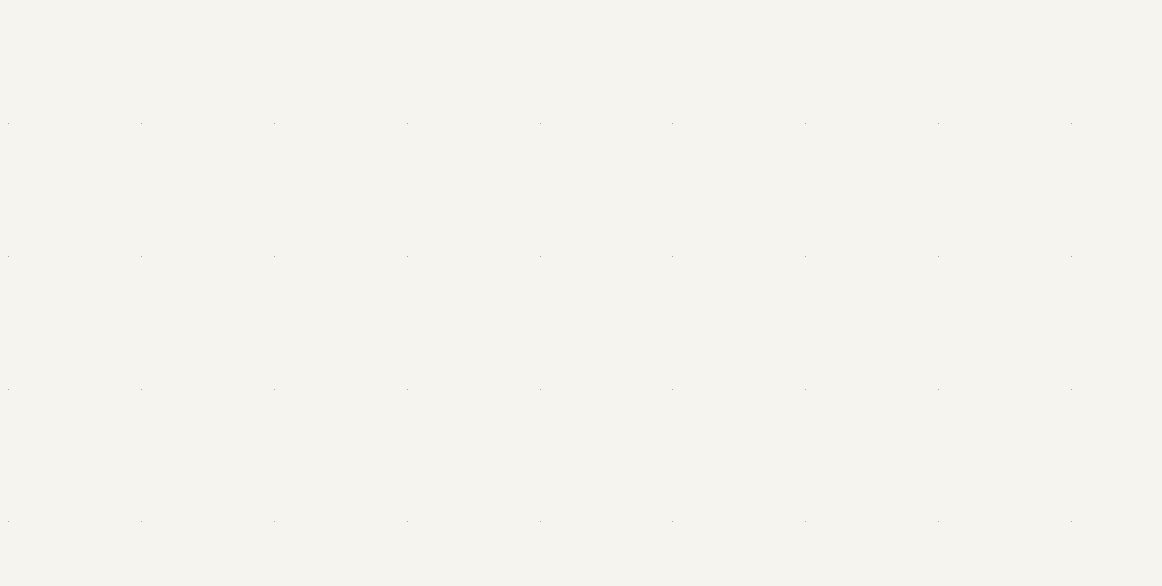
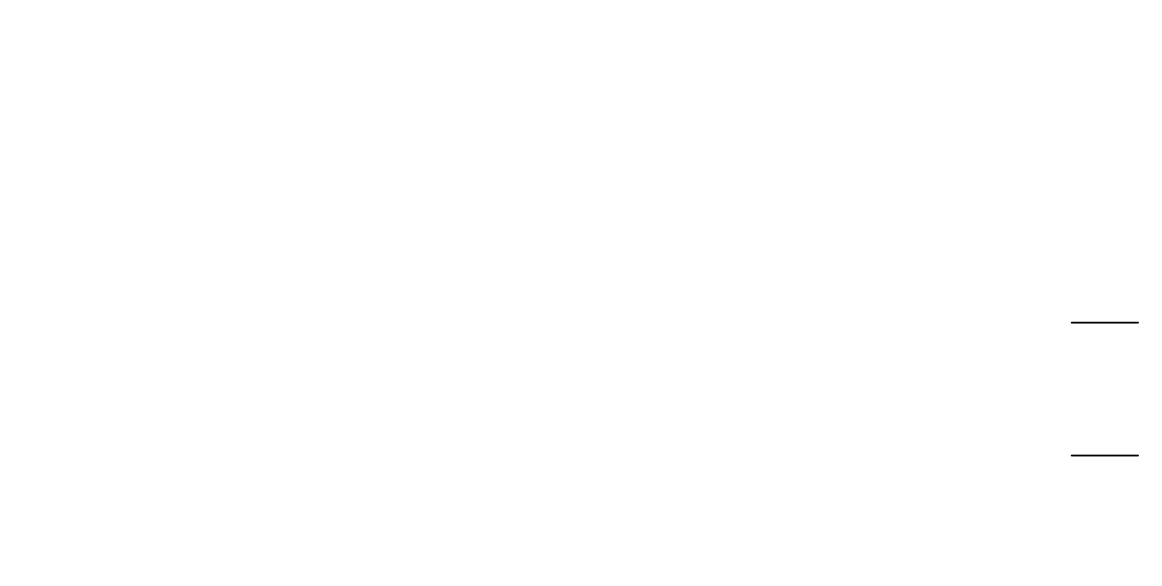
wire: none -> (1071, 322) (1138, 322)
wire: none -> (1071, 455) (1138, 455)

